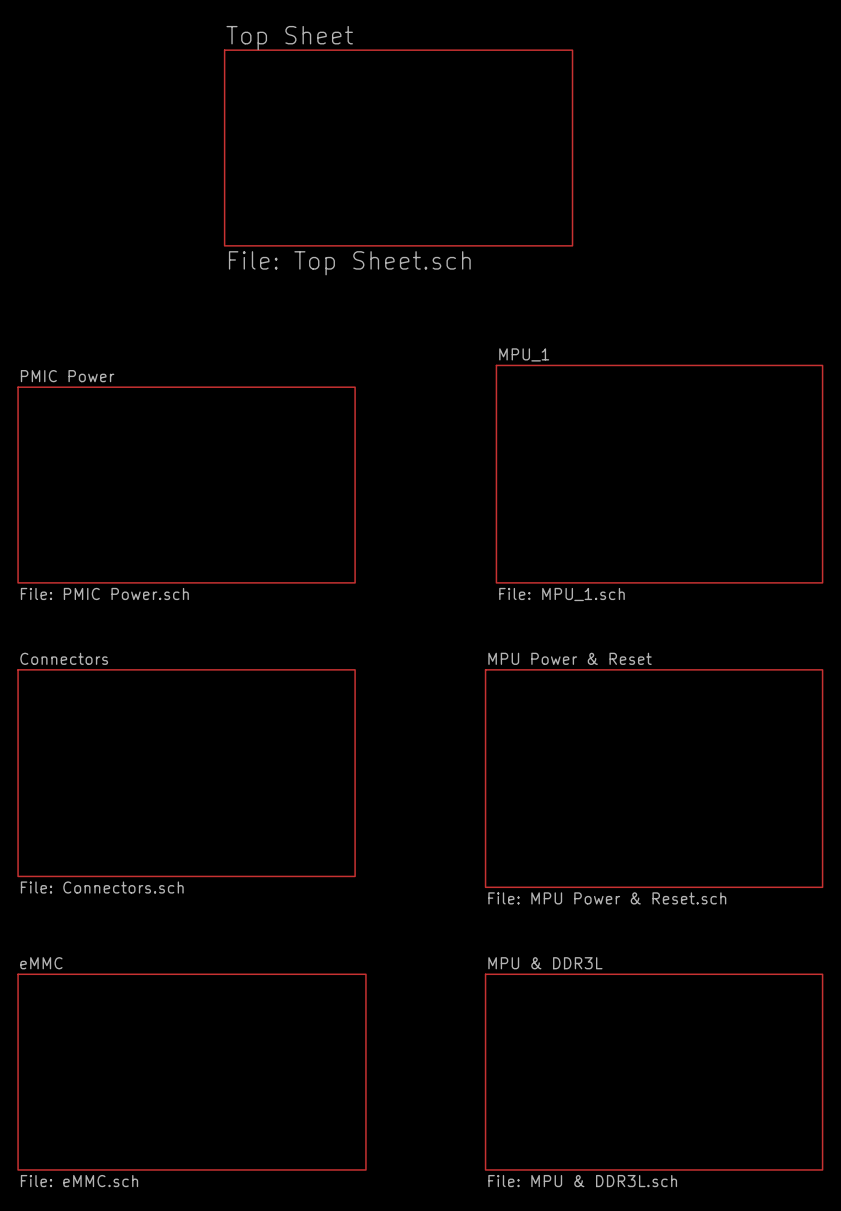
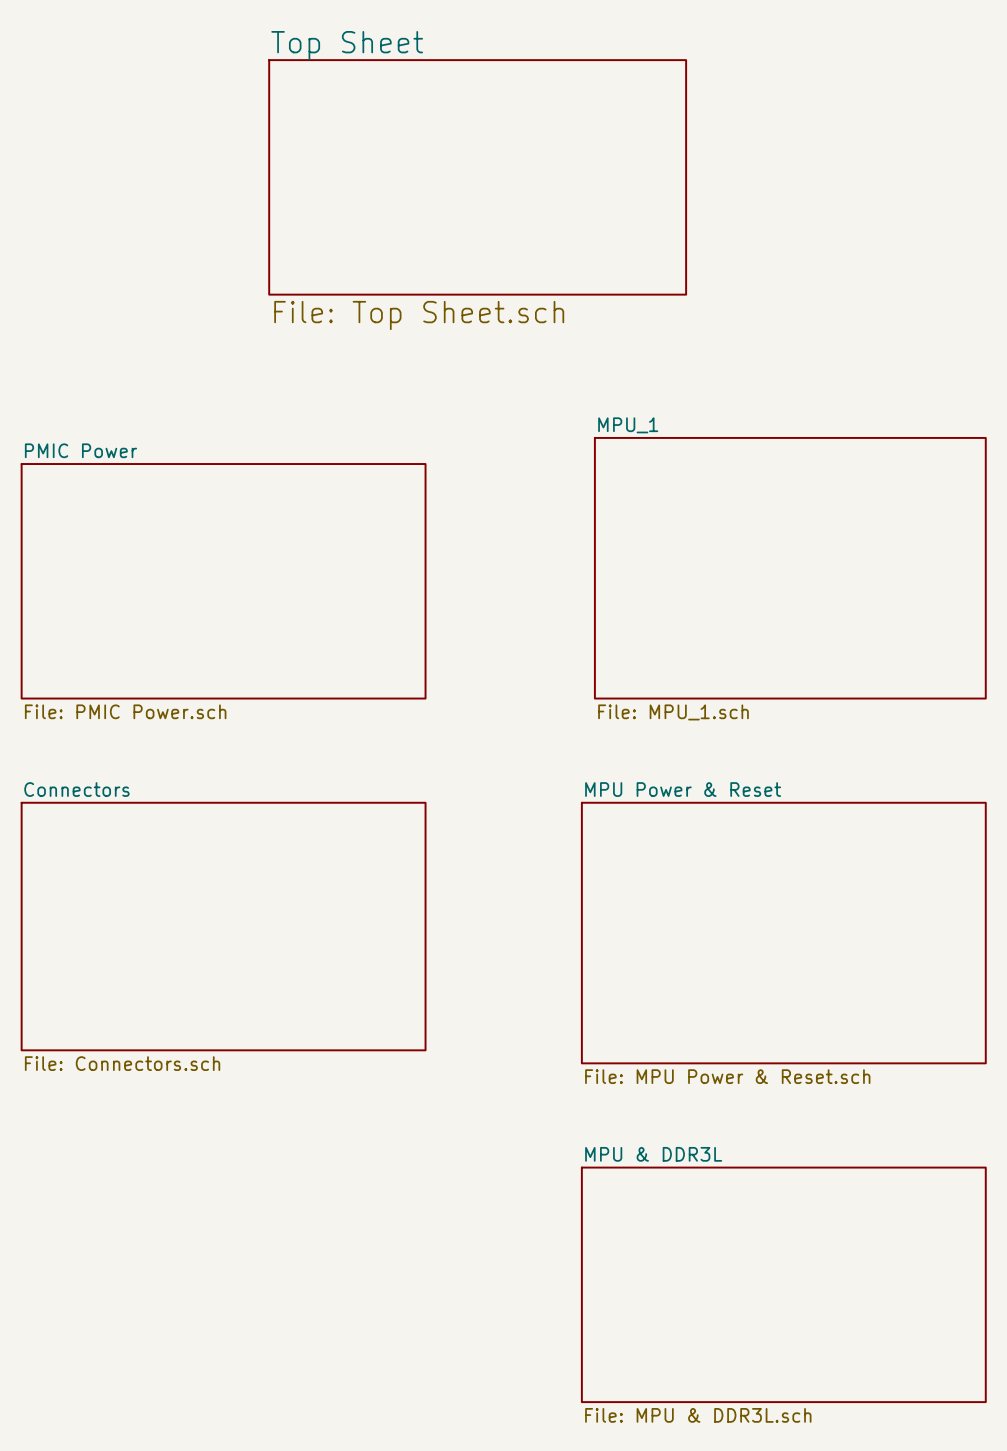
sheet eMMC: File: eMMC.sch (192, 1072) -> none

